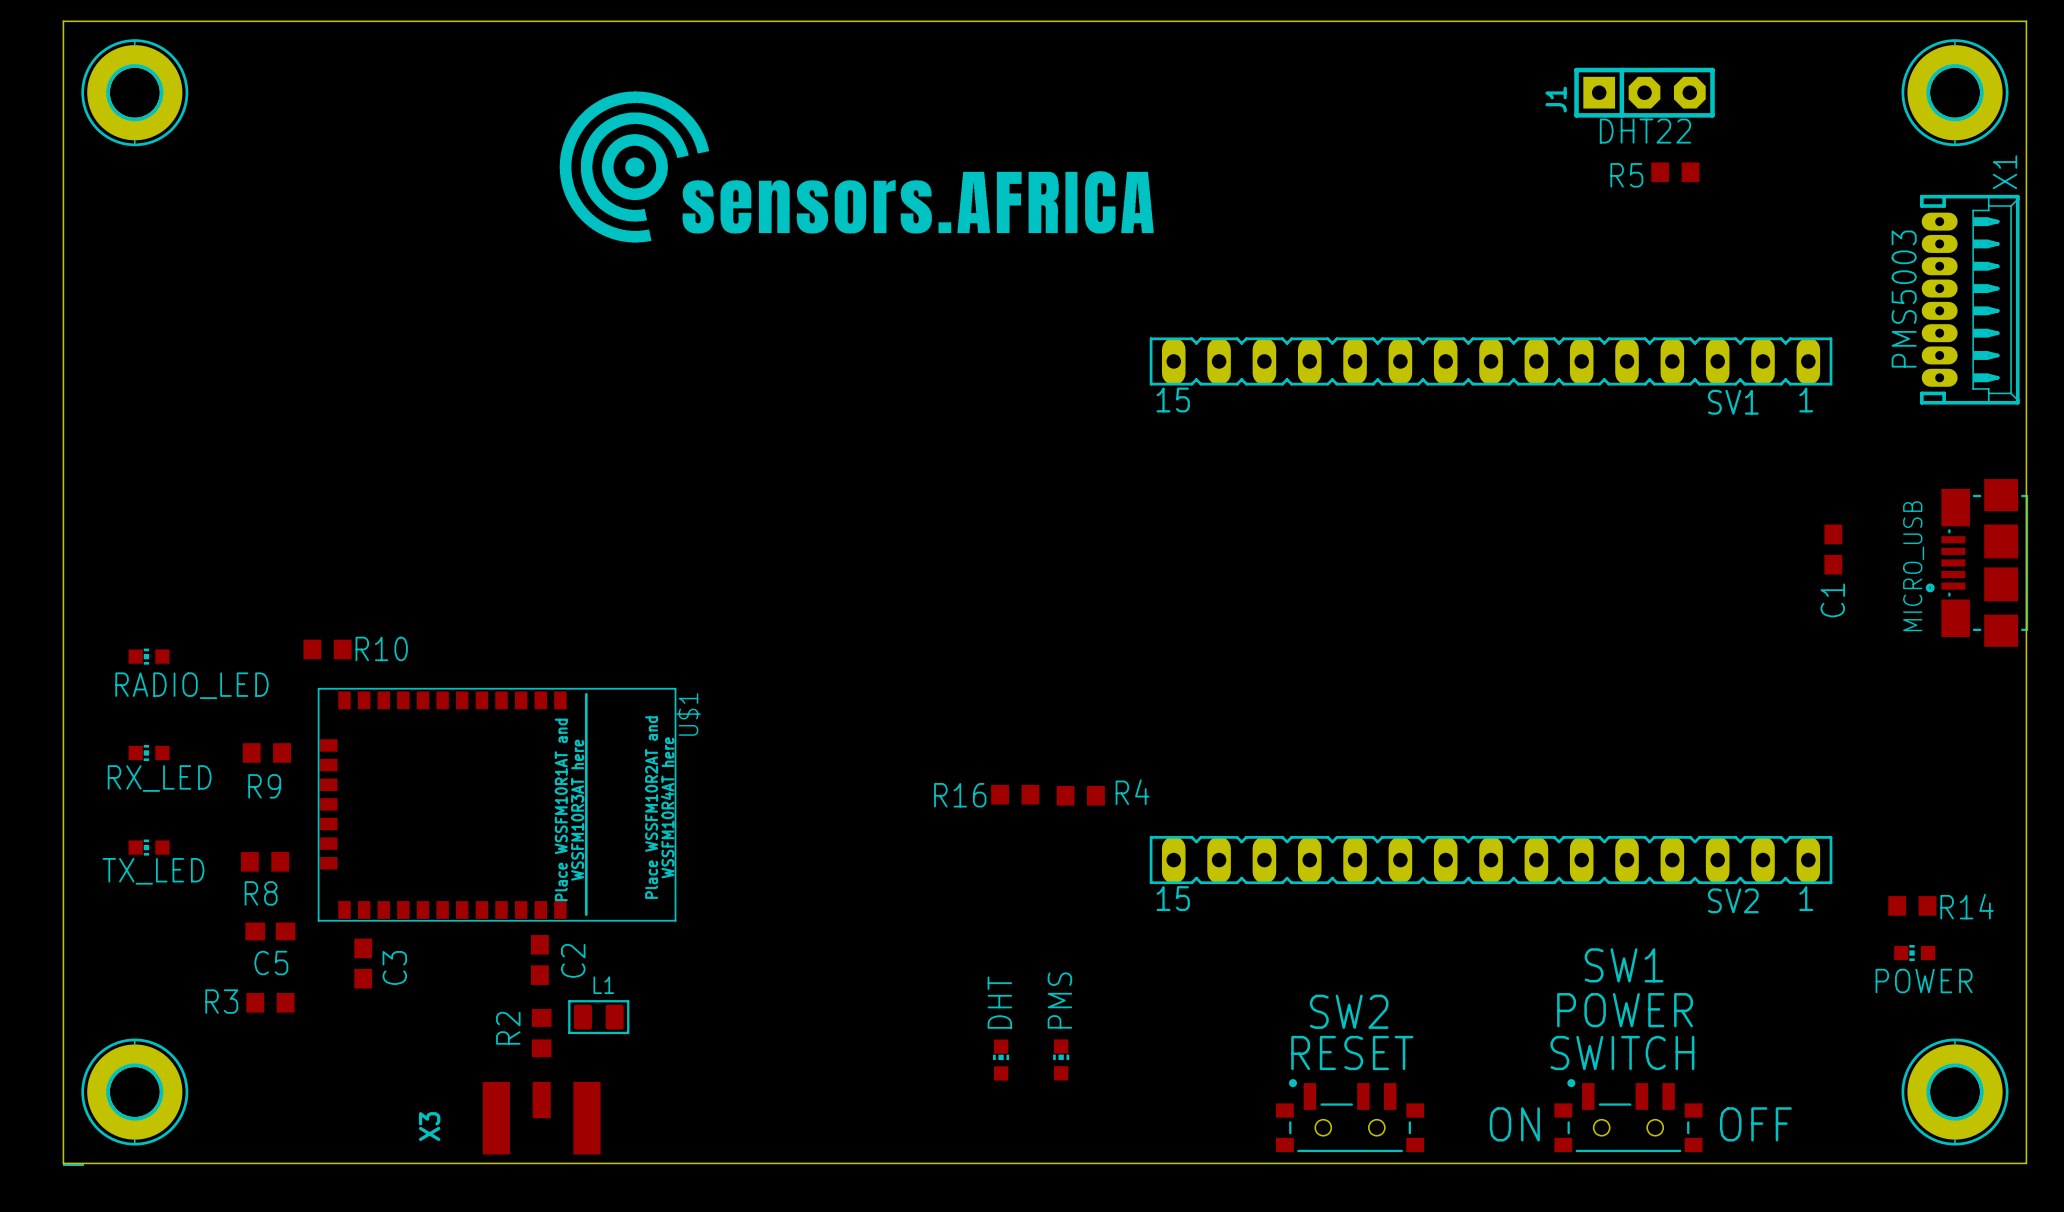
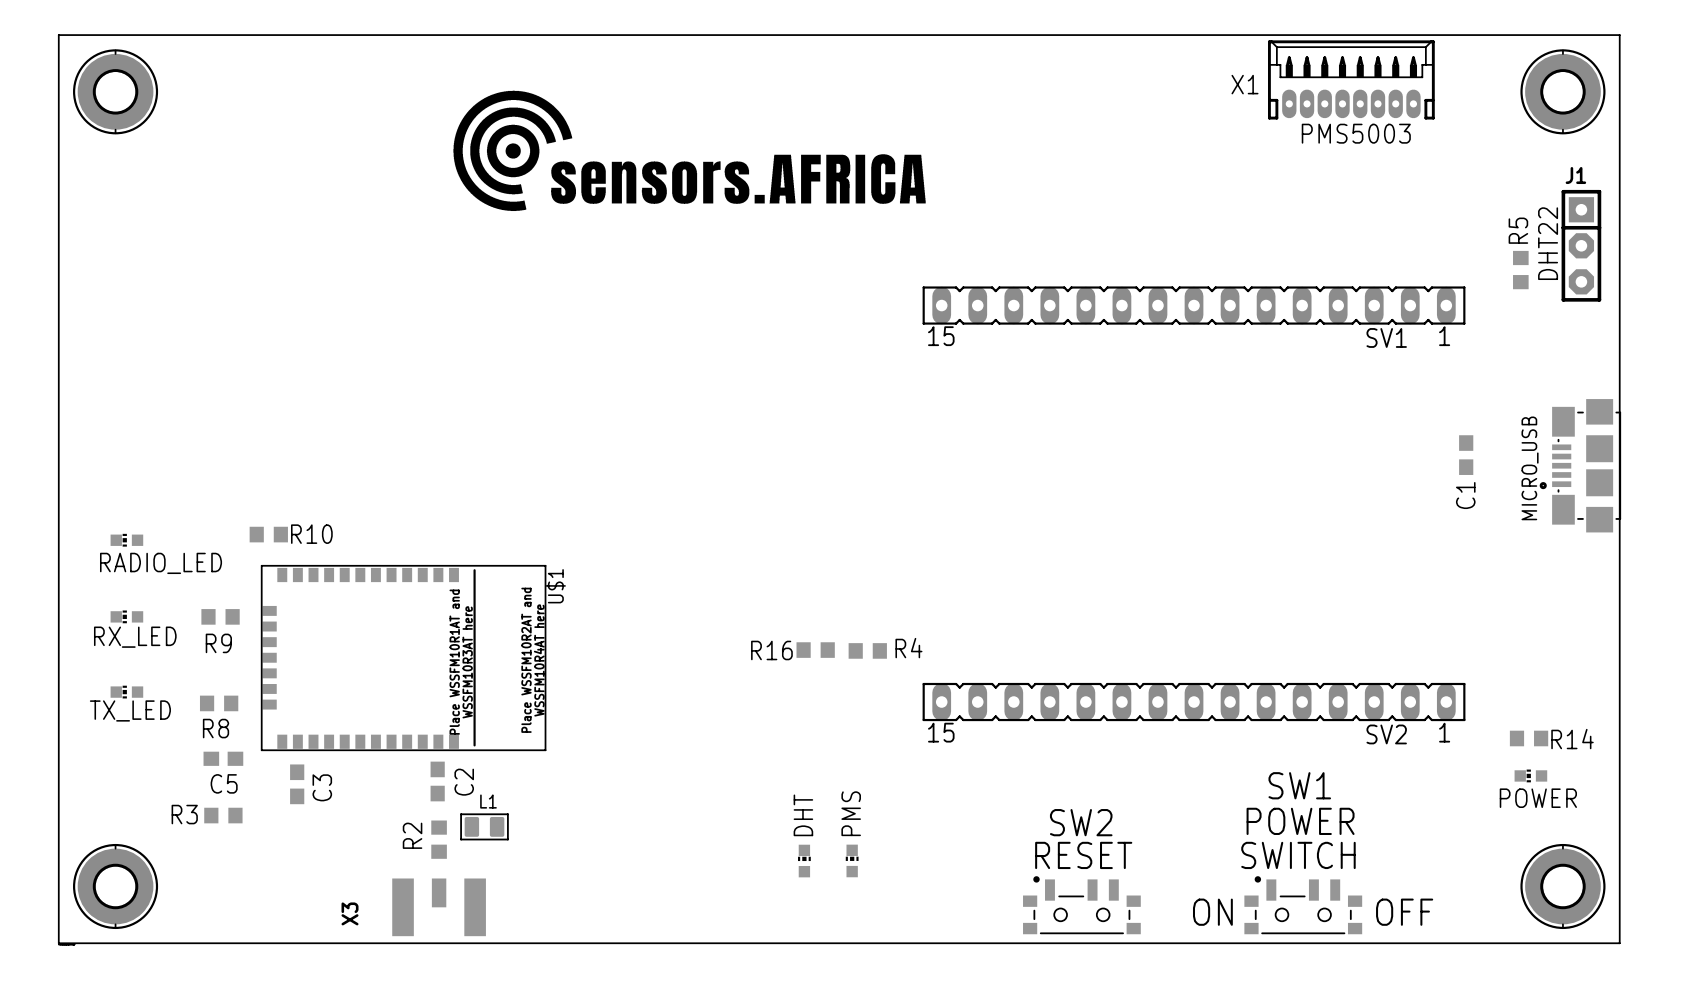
J1 rotation: 0° (1644, 92) -> 90° clockwise (1581, 245)
J1 position: (1644, 92) -> (1581, 245)
text rotation: 0° (1645, 131) -> 90° counterclockwise (1548, 243)
text position: DHT22 (1645, 131) -> DHT22 (1548, 243)
R5 rotation: 0° (1675, 172) -> 90° clockwise (1520, 270)
R5 position: (1675, 172) -> (1520, 270)
X1 name position: X1 (2004, 172) -> X1 (1245, 84)
text rotation: 0° (1904, 299) -> 90° clockwise (1356, 133)
text position: PMS5003 (1904, 299) -> PMS5003 (1356, 133)
X1 rotation: 0° (1969, 299) -> 90° counterclockwise (1351, 79)
X1 position: (1969, 299) -> (1351, 79)

